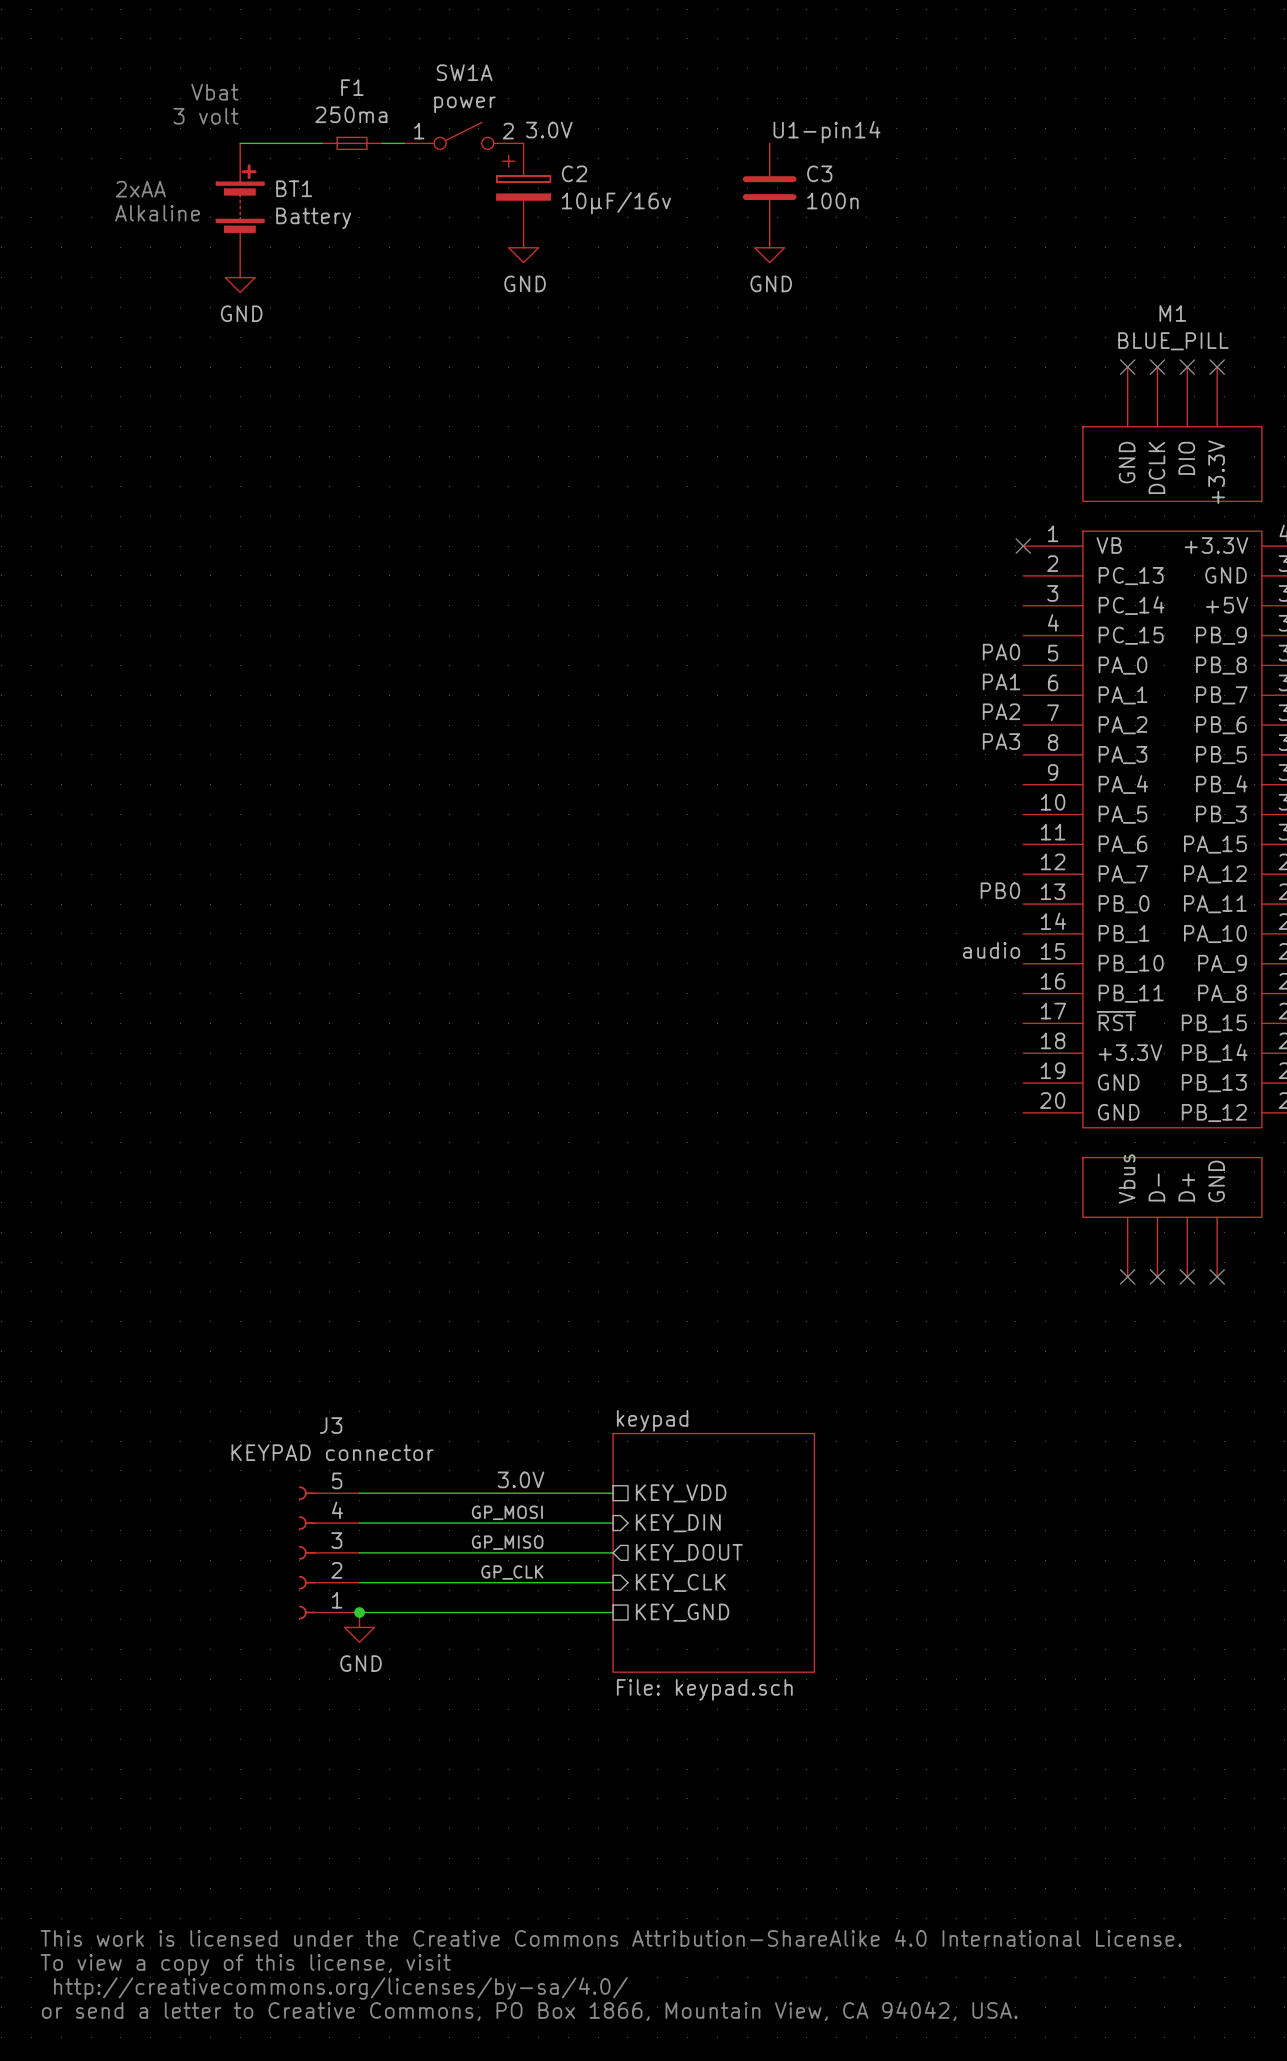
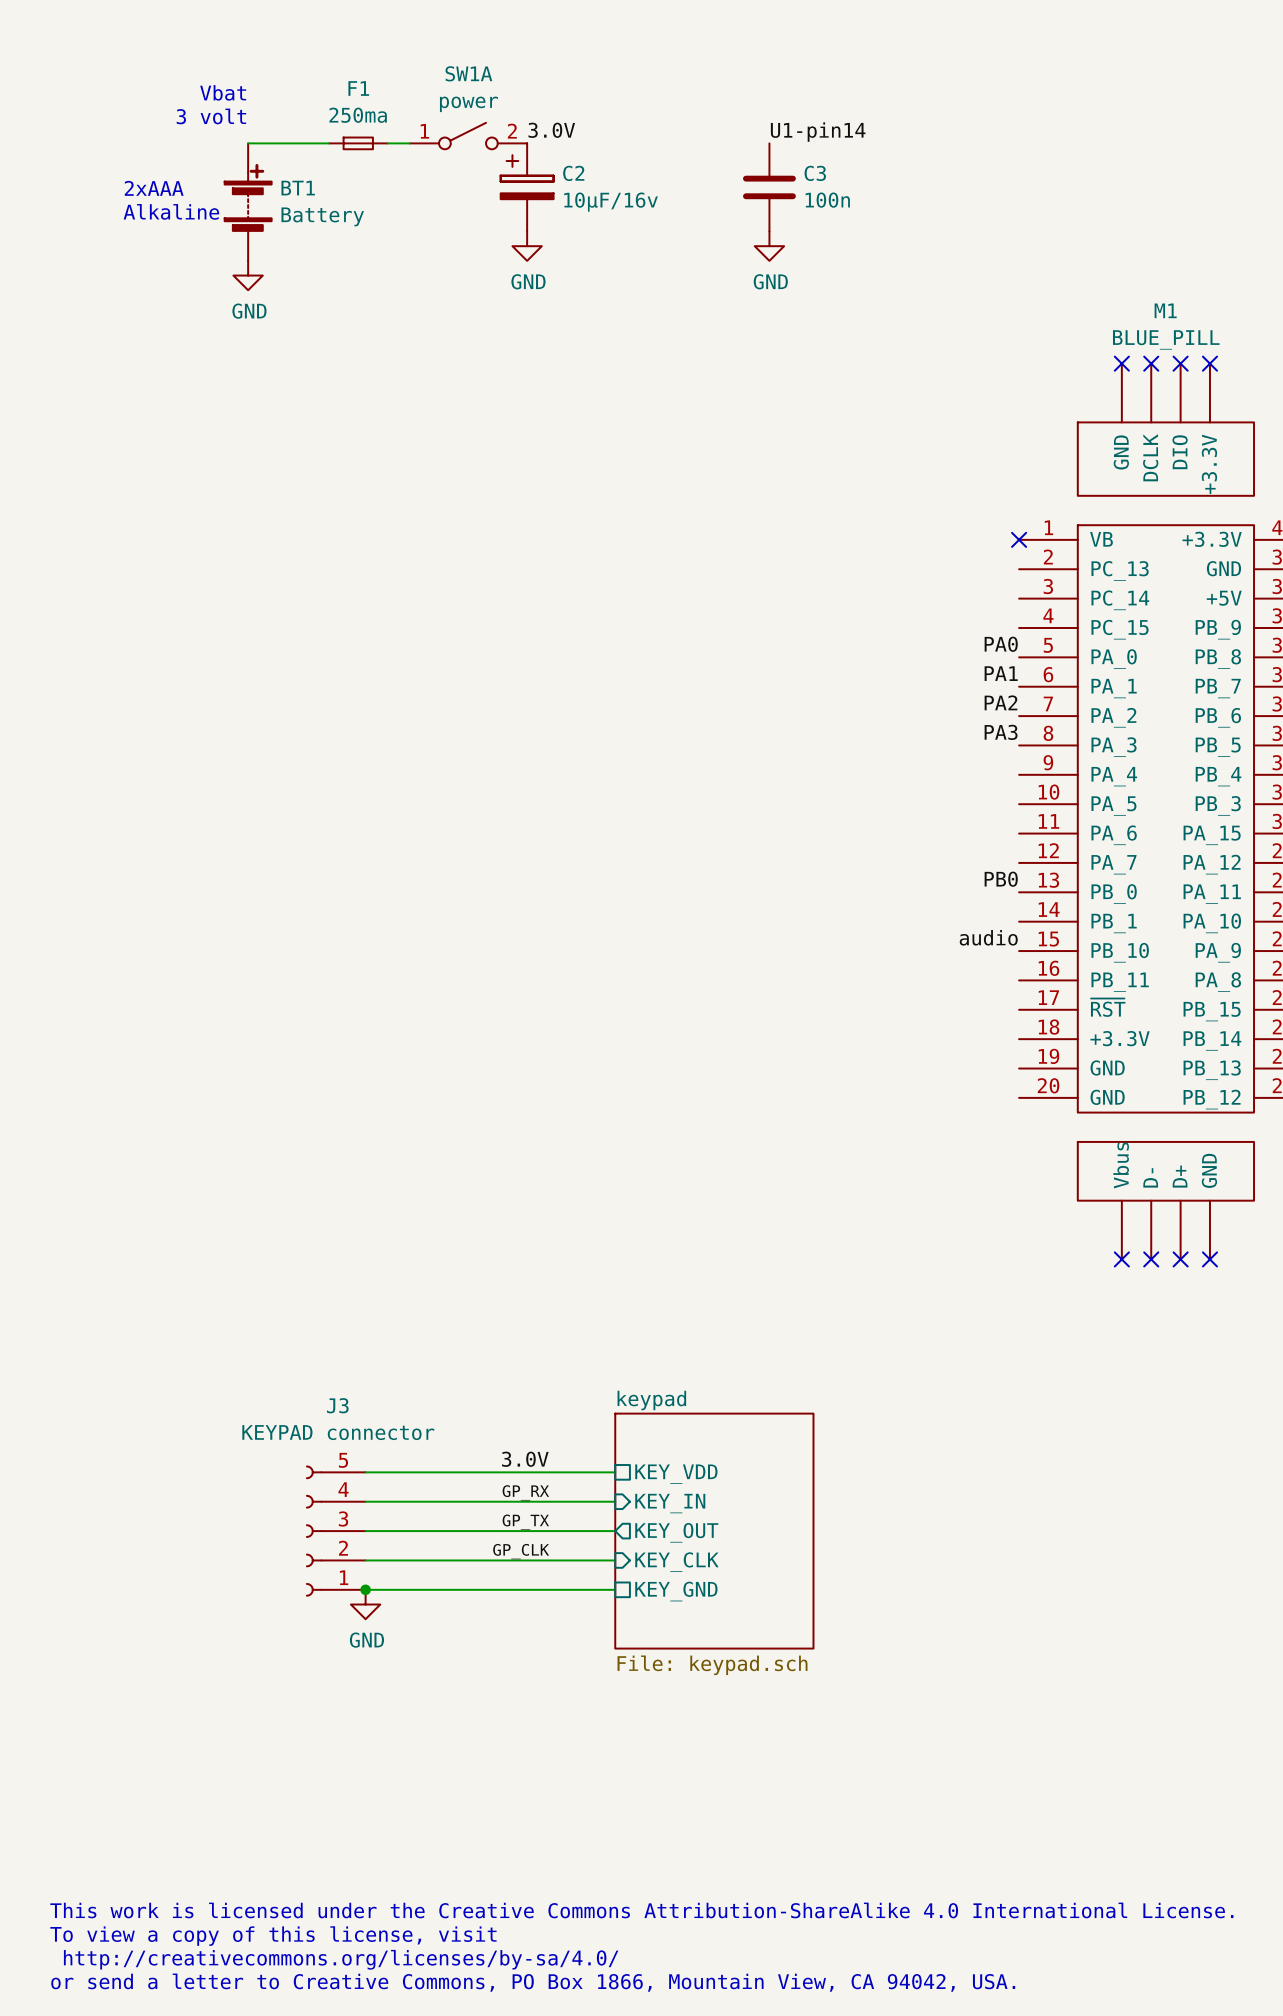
text: 2xAA (140, 189) -> 2xAAA (154, 188)
label: GP_MOSI (507, 1512) -> GP_RX (525, 1492)
sheet pin: KEY_DIN (678, 1523) -> KEY_IN (670, 1503)
label: GP_MISO (507, 1542) -> GP_TX (525, 1522)
sheet pin: KEY_DOUT (689, 1553) -> KEY_OUT (676, 1532)

